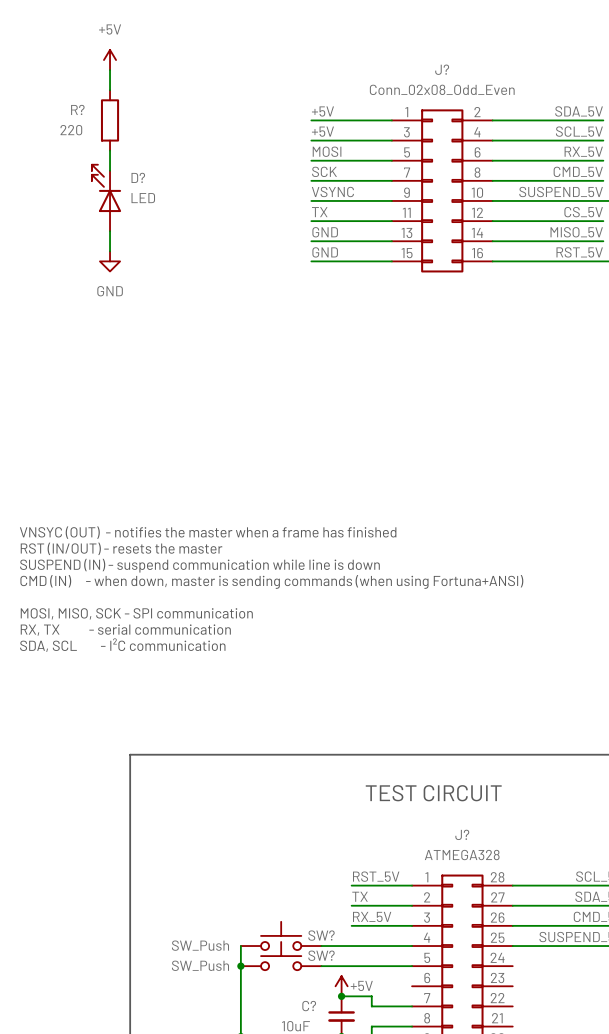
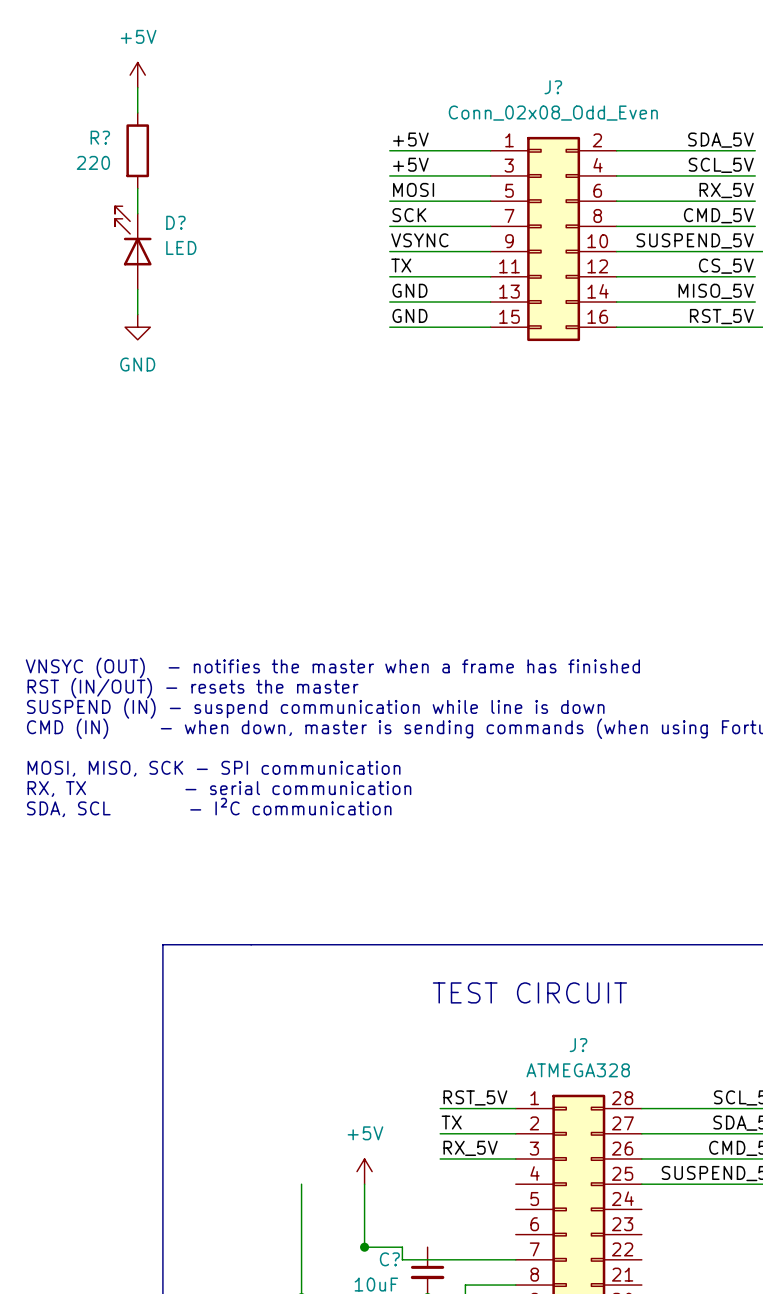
SW?: SW_Push (281, 935) -> none
wire: (321, 946) (412, 946) -> none
SW?: SW_Push (281, 956) -> none
junction: (240, 966) -> none
wire: (321, 966) (412, 966) -> none
power symbol text position: +5V (361, 985) -> +5V (365, 1133)
power symbol position: +5V (341, 986) -> +5V (364, 1171)
junction: none -> (364, 1247)
wire: (341, 996) (371, 996) (371, 1006) -> (364, 1184) (364, 1247) (402, 1247) (402, 1259) (465, 1259)
junction: (341, 996) -> none

